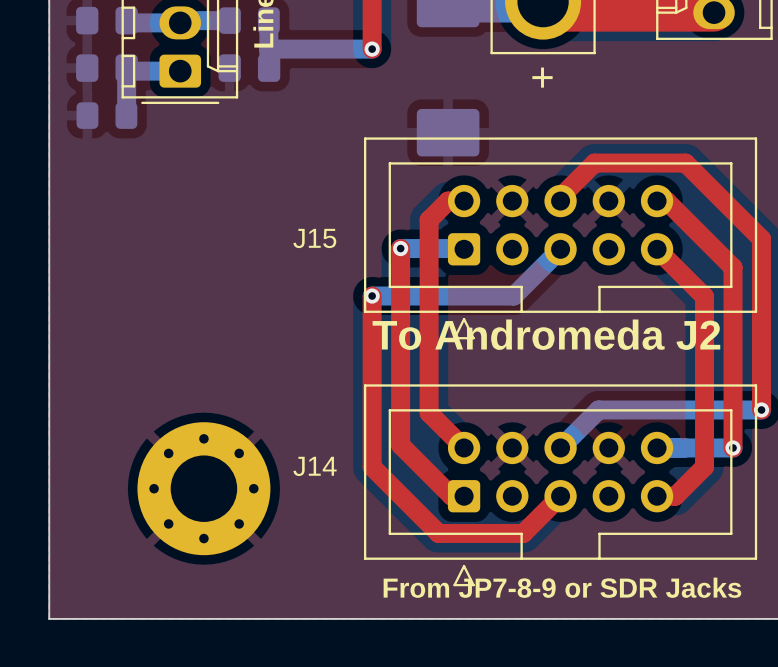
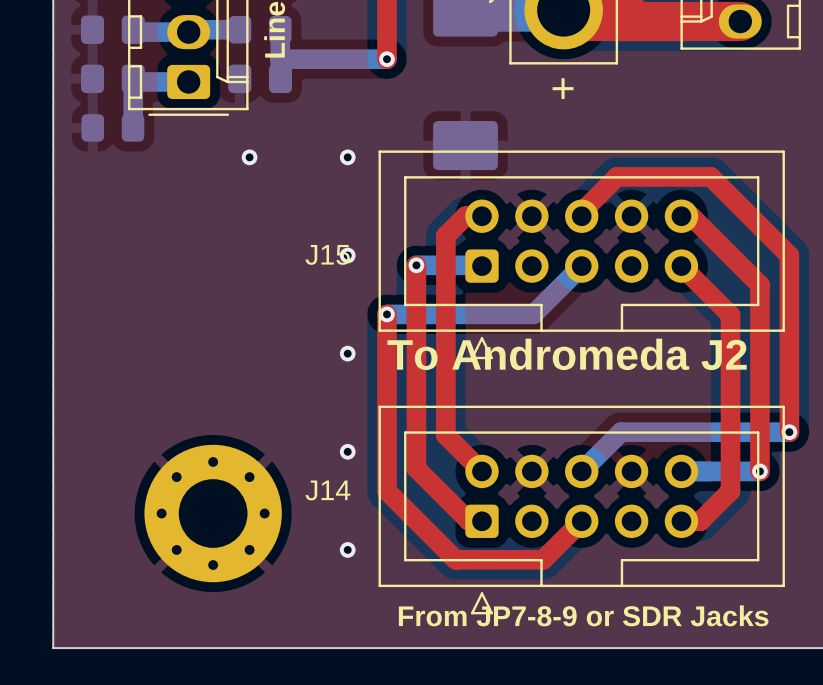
via: none -> (249, 157)
via: none -> (347, 157)
via: none -> (347, 255)
via: none -> (347, 353)
via: none -> (347, 451)
via: none -> (347, 549)

